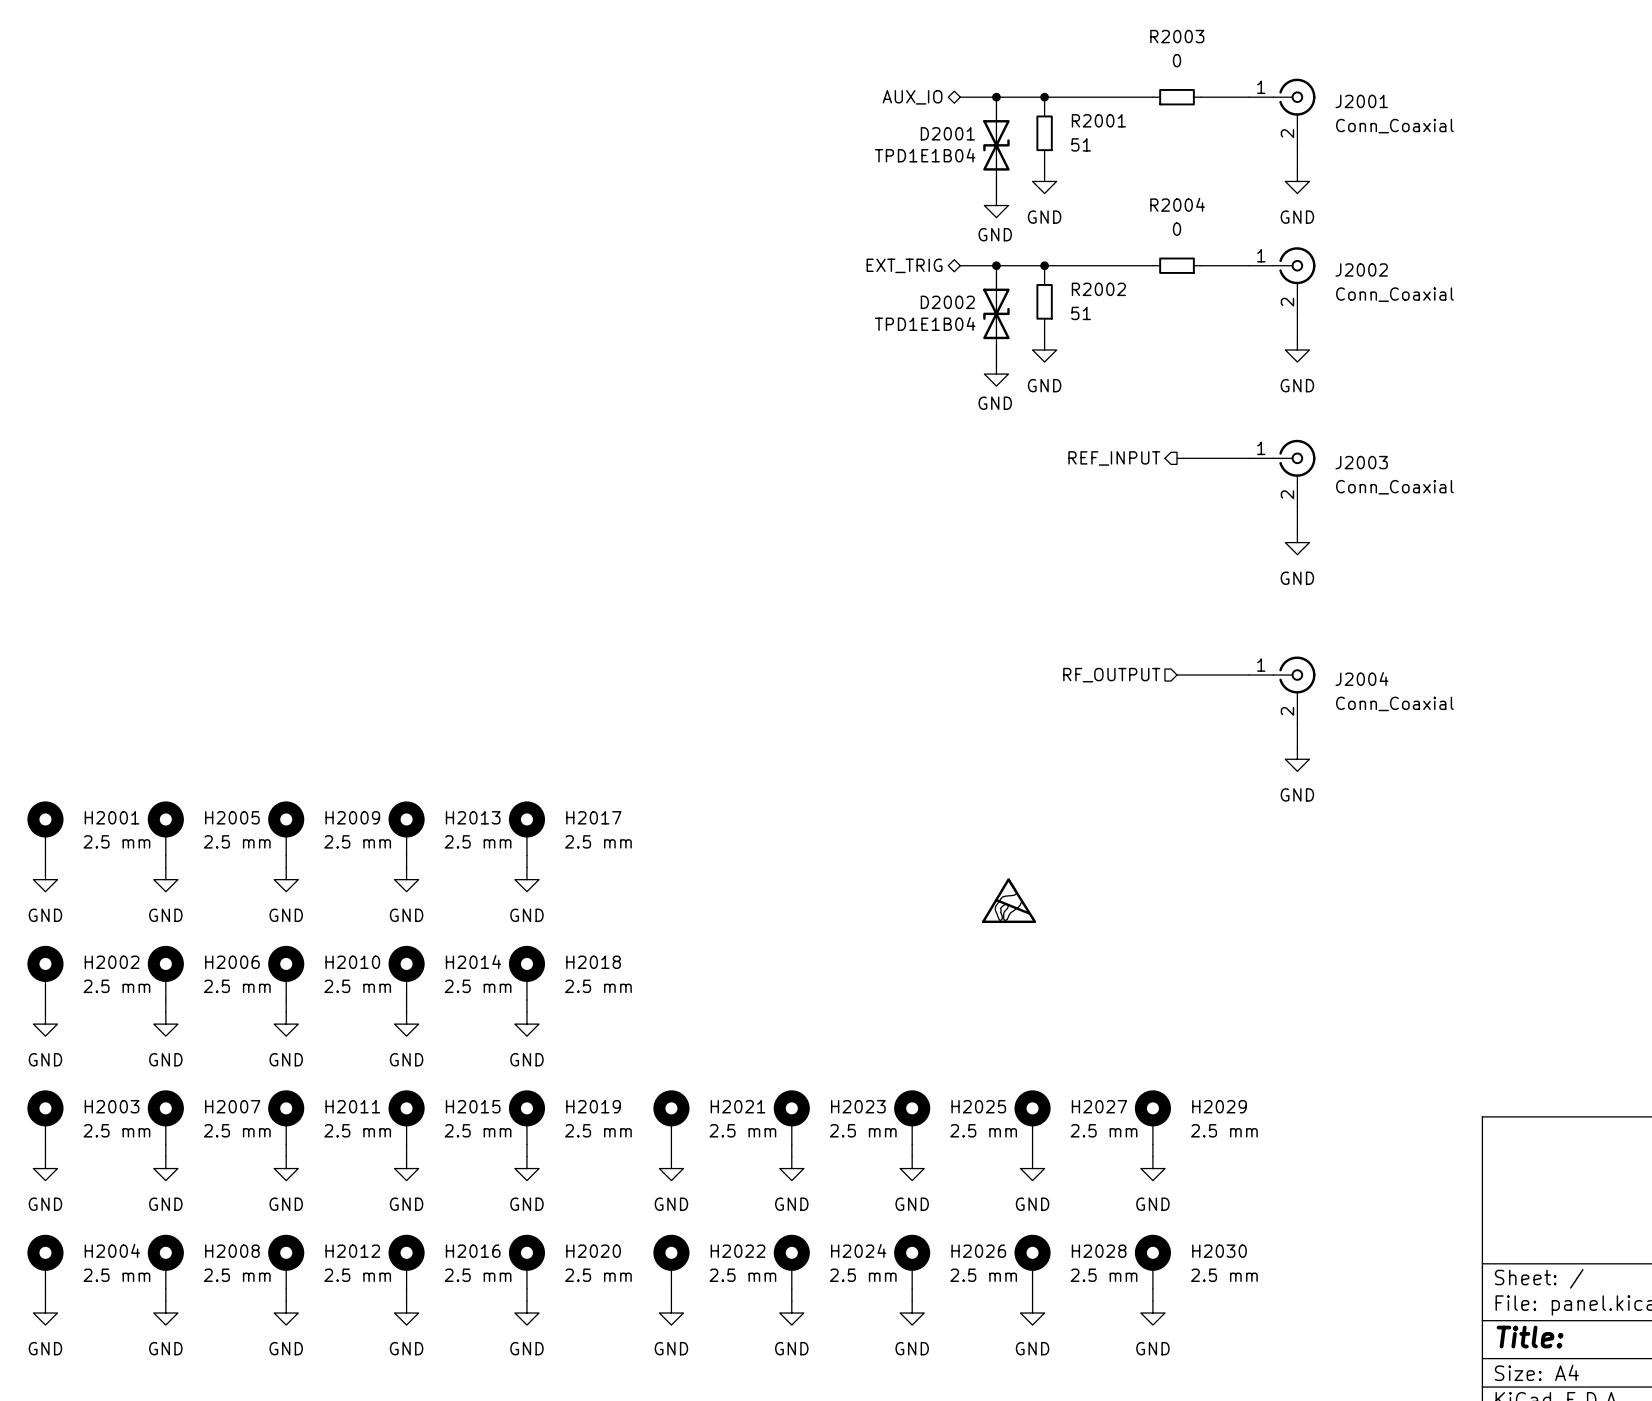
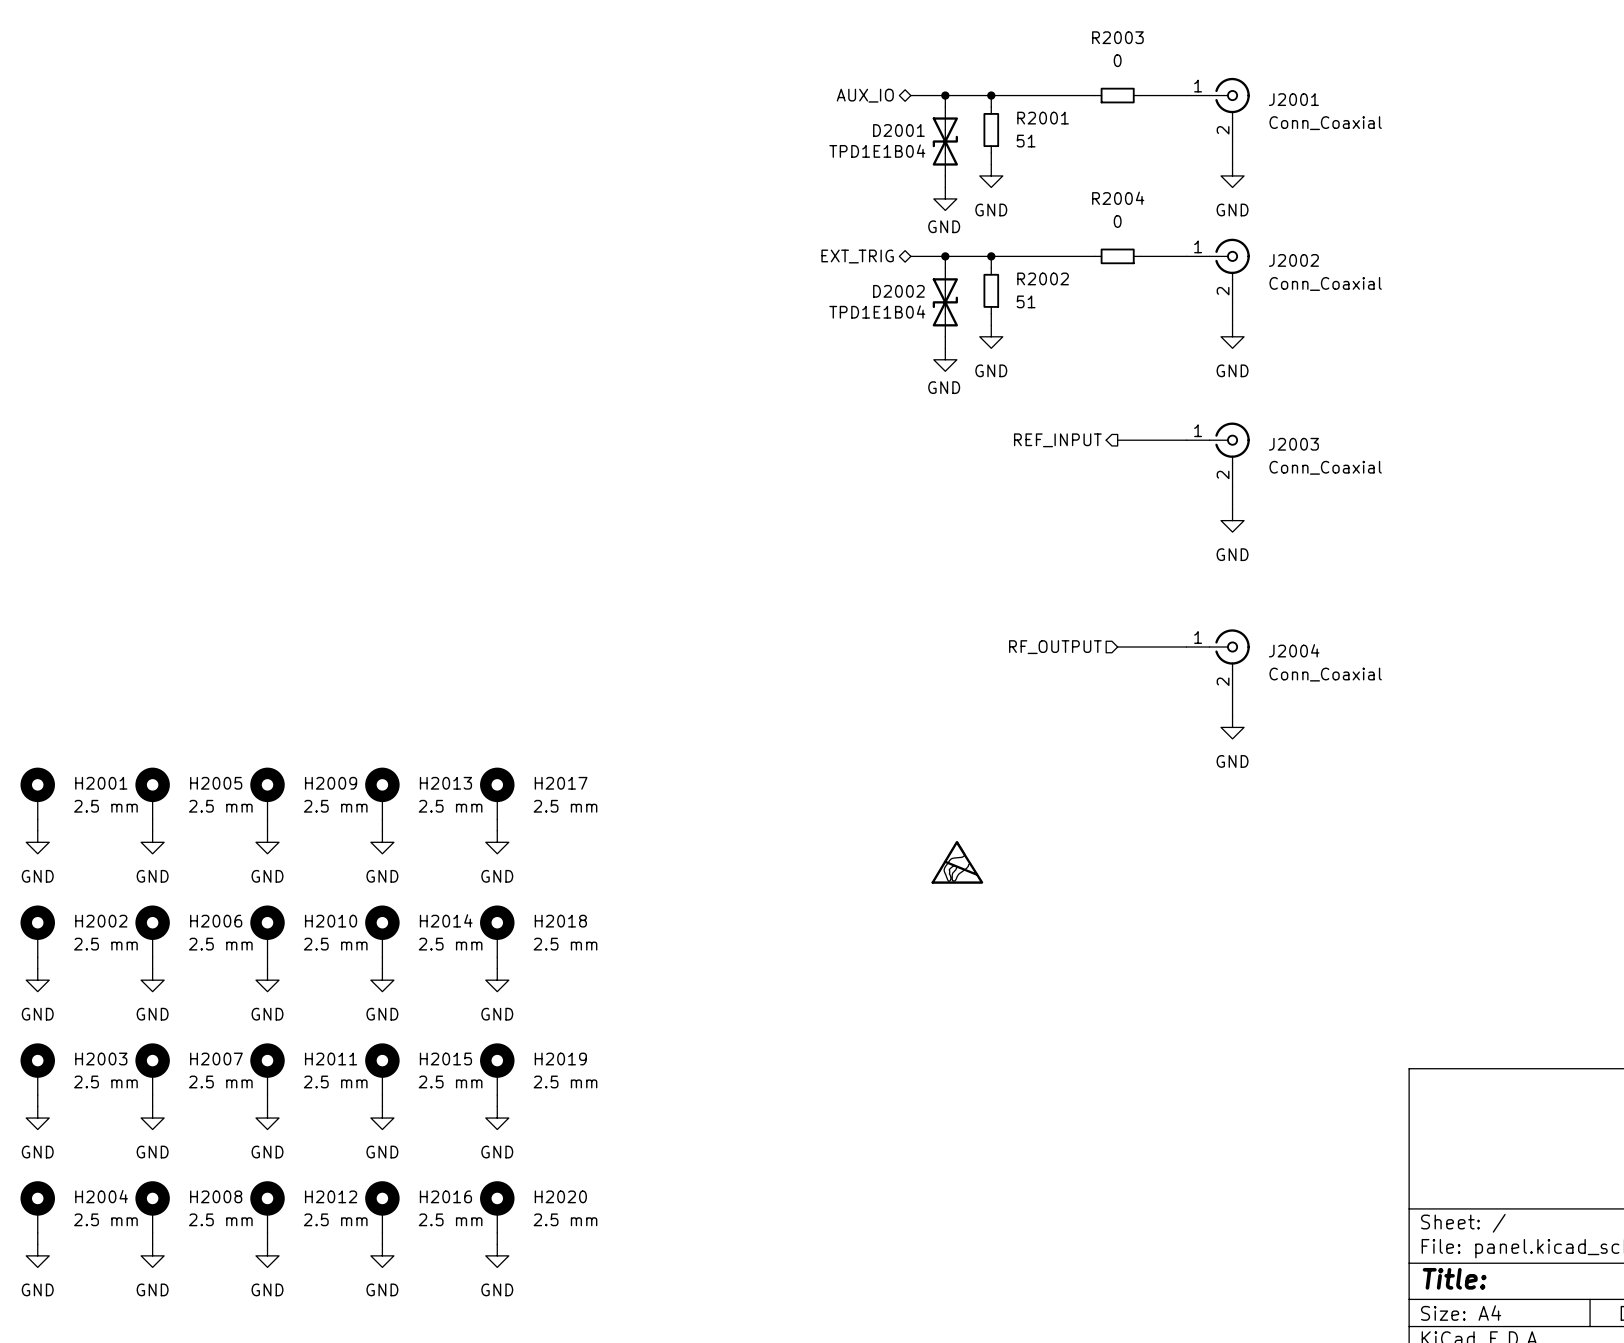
H2021: 2.5 mm (671, 1117) -> none
H2023: 2.5 mm (791, 1117) -> none
H2025: 2.5 mm (912, 1117) -> none
H2027: 2.5 mm (1032, 1117) -> none
H2029: 2.5 mm (1152, 1117) -> none
wire: (671, 1144) (671, 1156) -> none
wire: (791, 1144) (791, 1156) -> none
wire: (912, 1144) (912, 1156) -> none
wire: (1032, 1144) (1032, 1156) -> none
wire: (1152, 1144) (1152, 1156) -> none
power symbol: GND (671, 1168) -> none
power symbol: GND (791, 1168) -> none
power symbol: GND (912, 1168) -> none
power symbol: GND (1032, 1168) -> none
power symbol: GND (1152, 1168) -> none
H2022: 2.5 mm (671, 1261) -> none
H2024: 2.5 mm (791, 1261) -> none
H2026: 2.5 mm (912, 1261) -> none
H2028: 2.5 mm (1032, 1261) -> none
H2030: 2.5 mm (1152, 1261) -> none
wire: (671, 1288) (671, 1300) -> none
wire: (791, 1288) (791, 1300) -> none
wire: (912, 1288) (912, 1300) -> none
wire: (1032, 1288) (1032, 1300) -> none
wire: (1152, 1288) (1152, 1300) -> none
power symbol: GND (671, 1313) -> none
power symbol: GND (791, 1313) -> none
power symbol: GND (912, 1313) -> none
power symbol: GND (1032, 1313) -> none
power symbol: GND (1152, 1313) -> none

